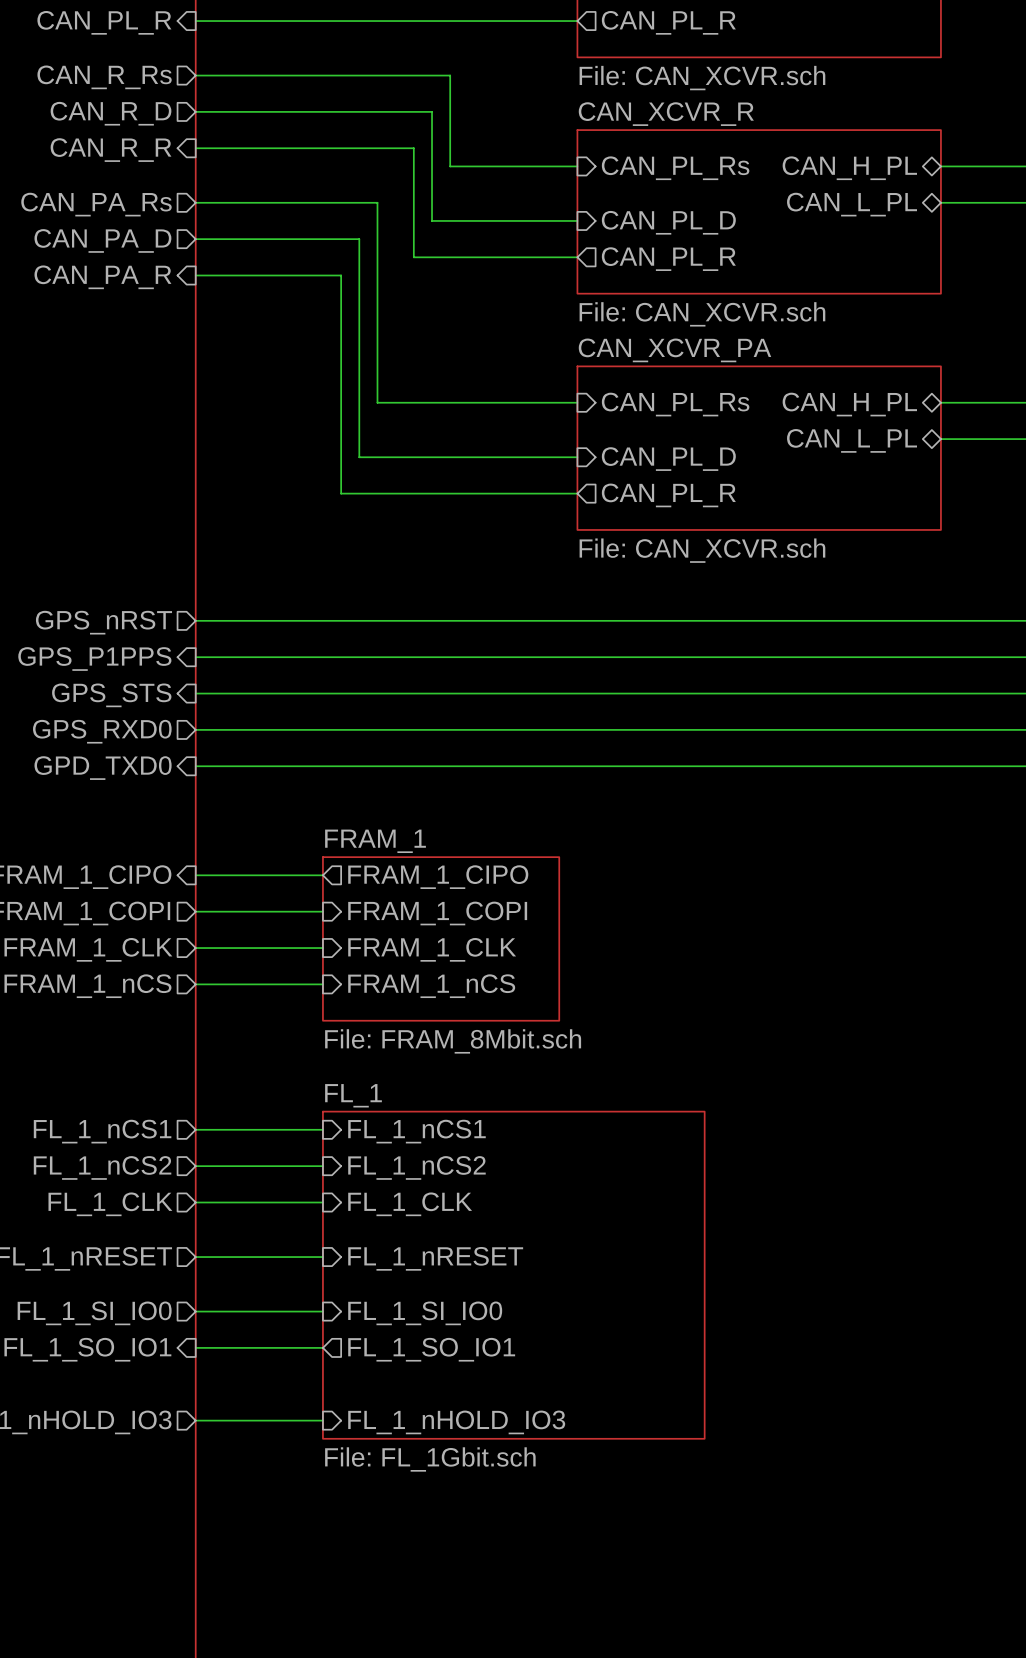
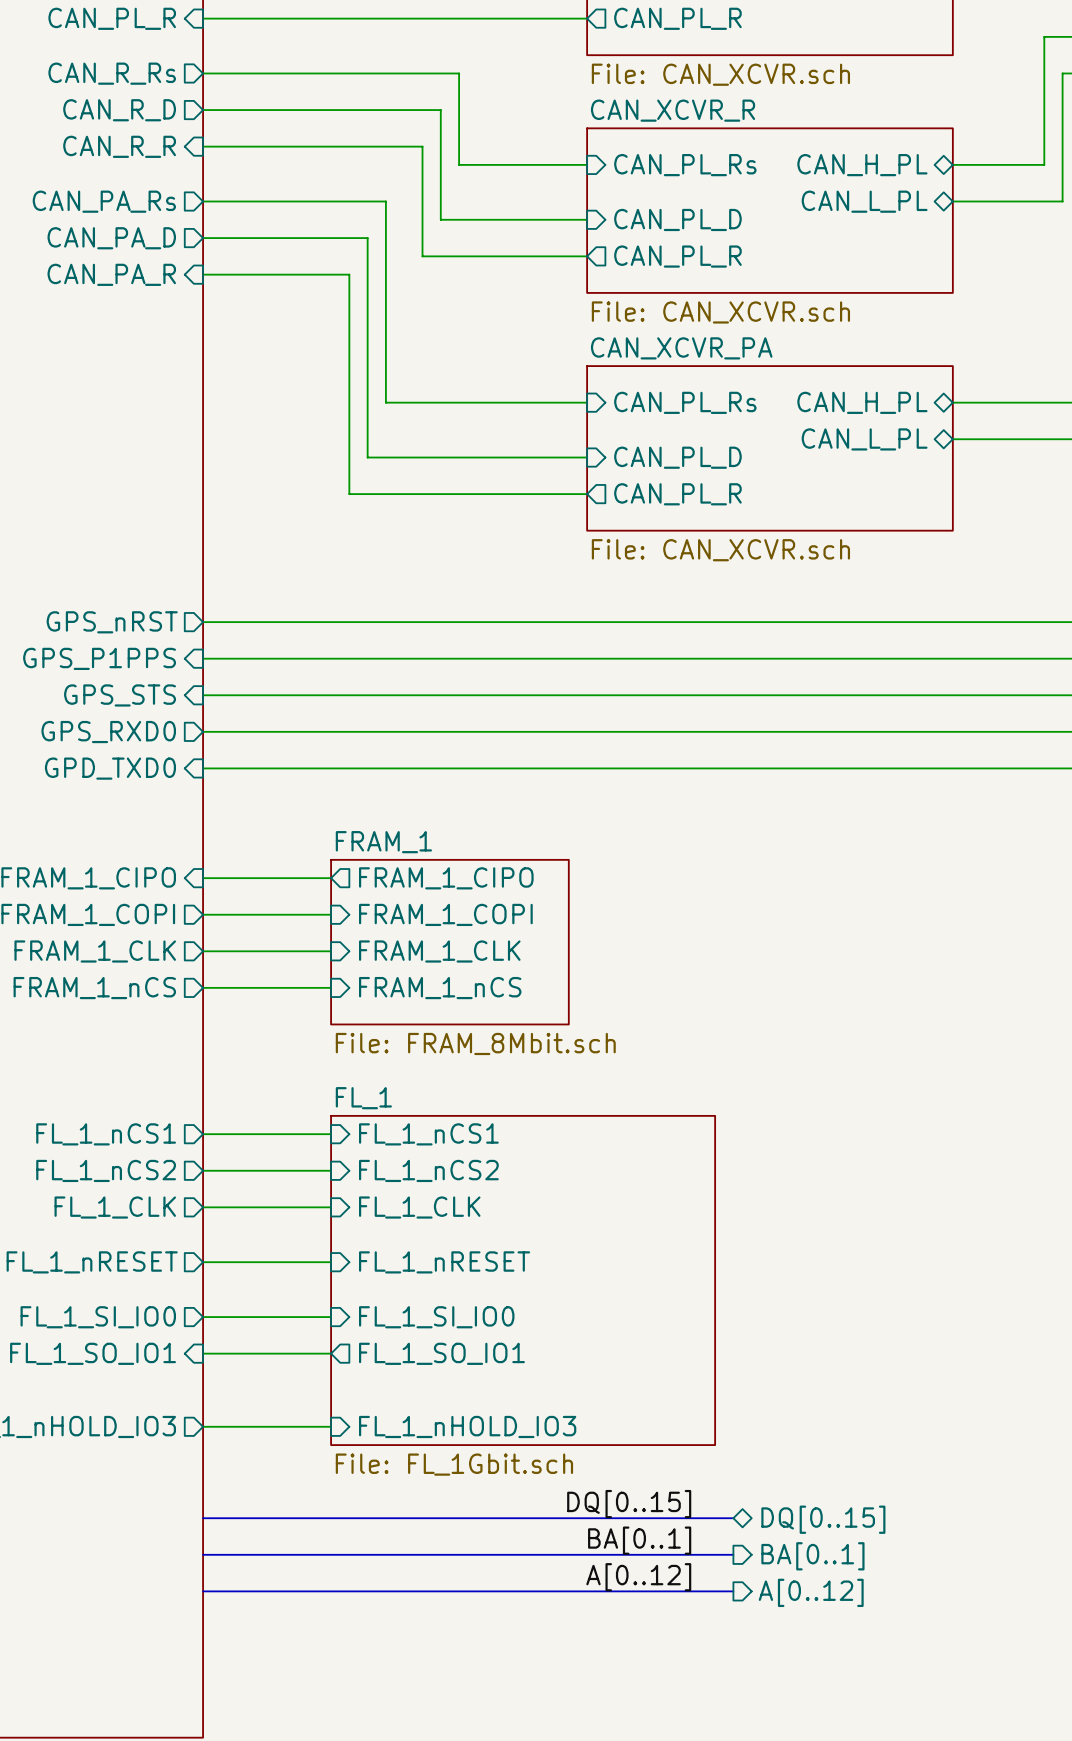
label: none -> DQ[0..15] (629, 1504)
bus: none -> (203, 1518) (733, 1518)
sheet pin: none -> DQ[0..15] (823, 1519)
label: none -> BA[0..1] (639, 1540)
bus: none -> (203, 1554) (733, 1554)
sheet pin: none -> BA[0..1] (812, 1556)
label: none -> A[0..12] (638, 1577)
bus: none -> (203, 1591) (733, 1591)
sheet pin: none -> A[0..12] (811, 1592)

